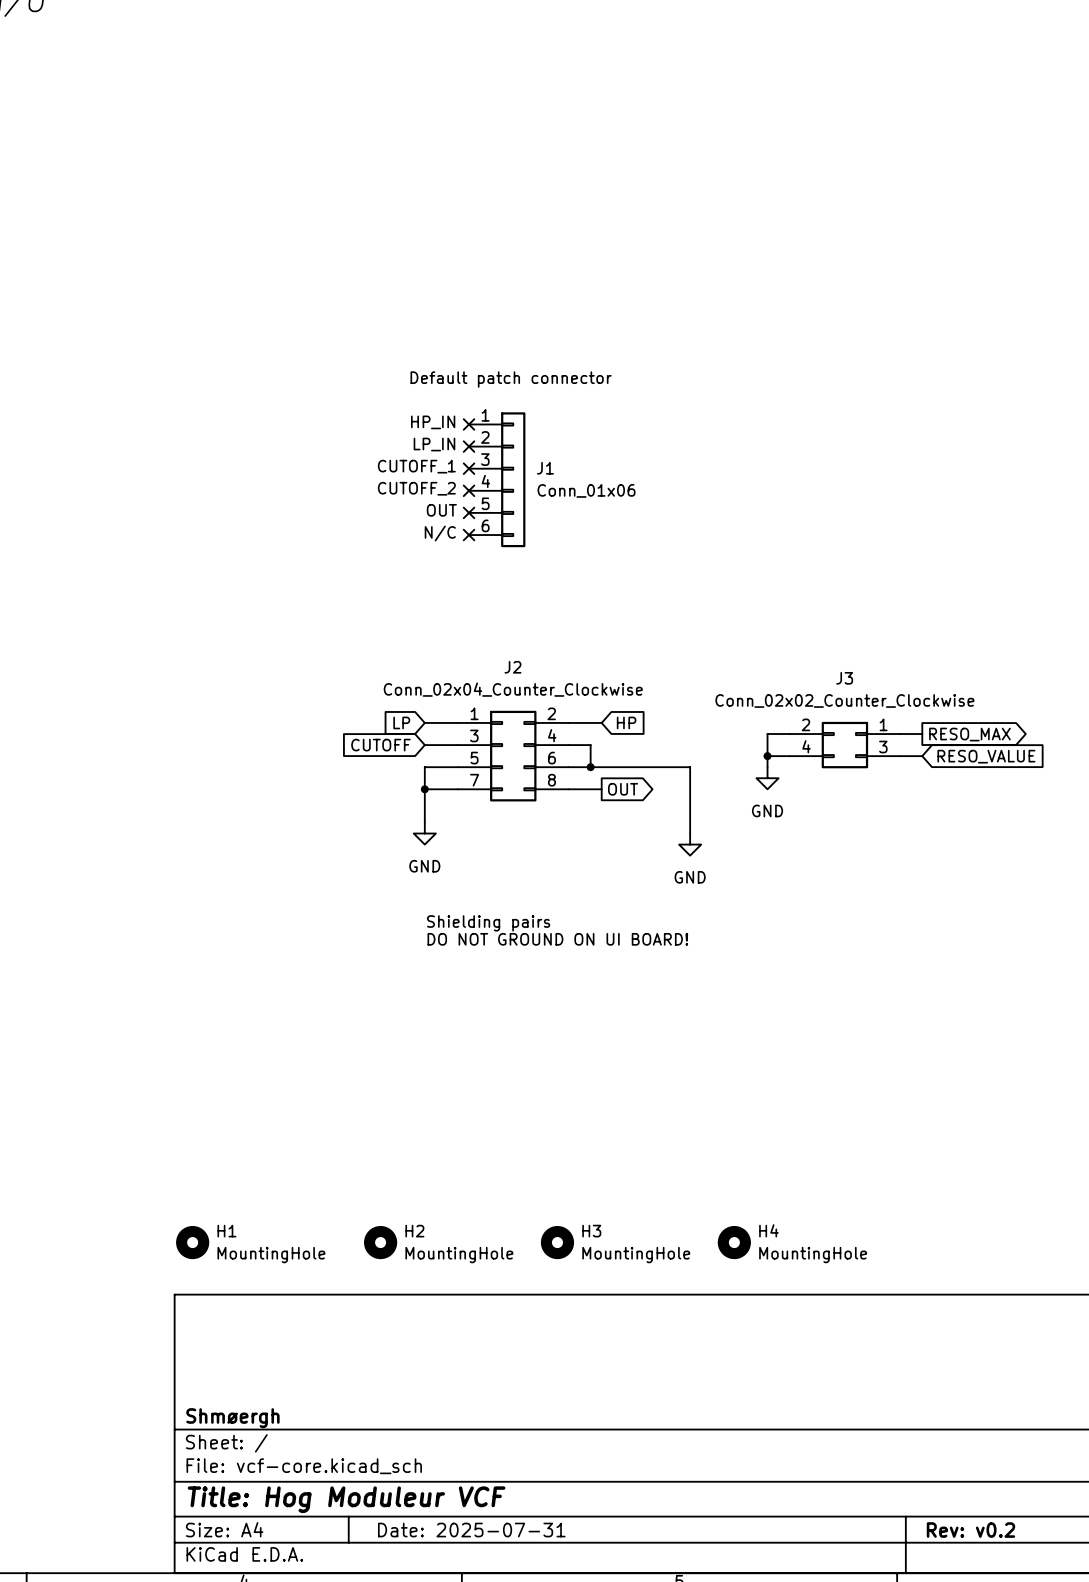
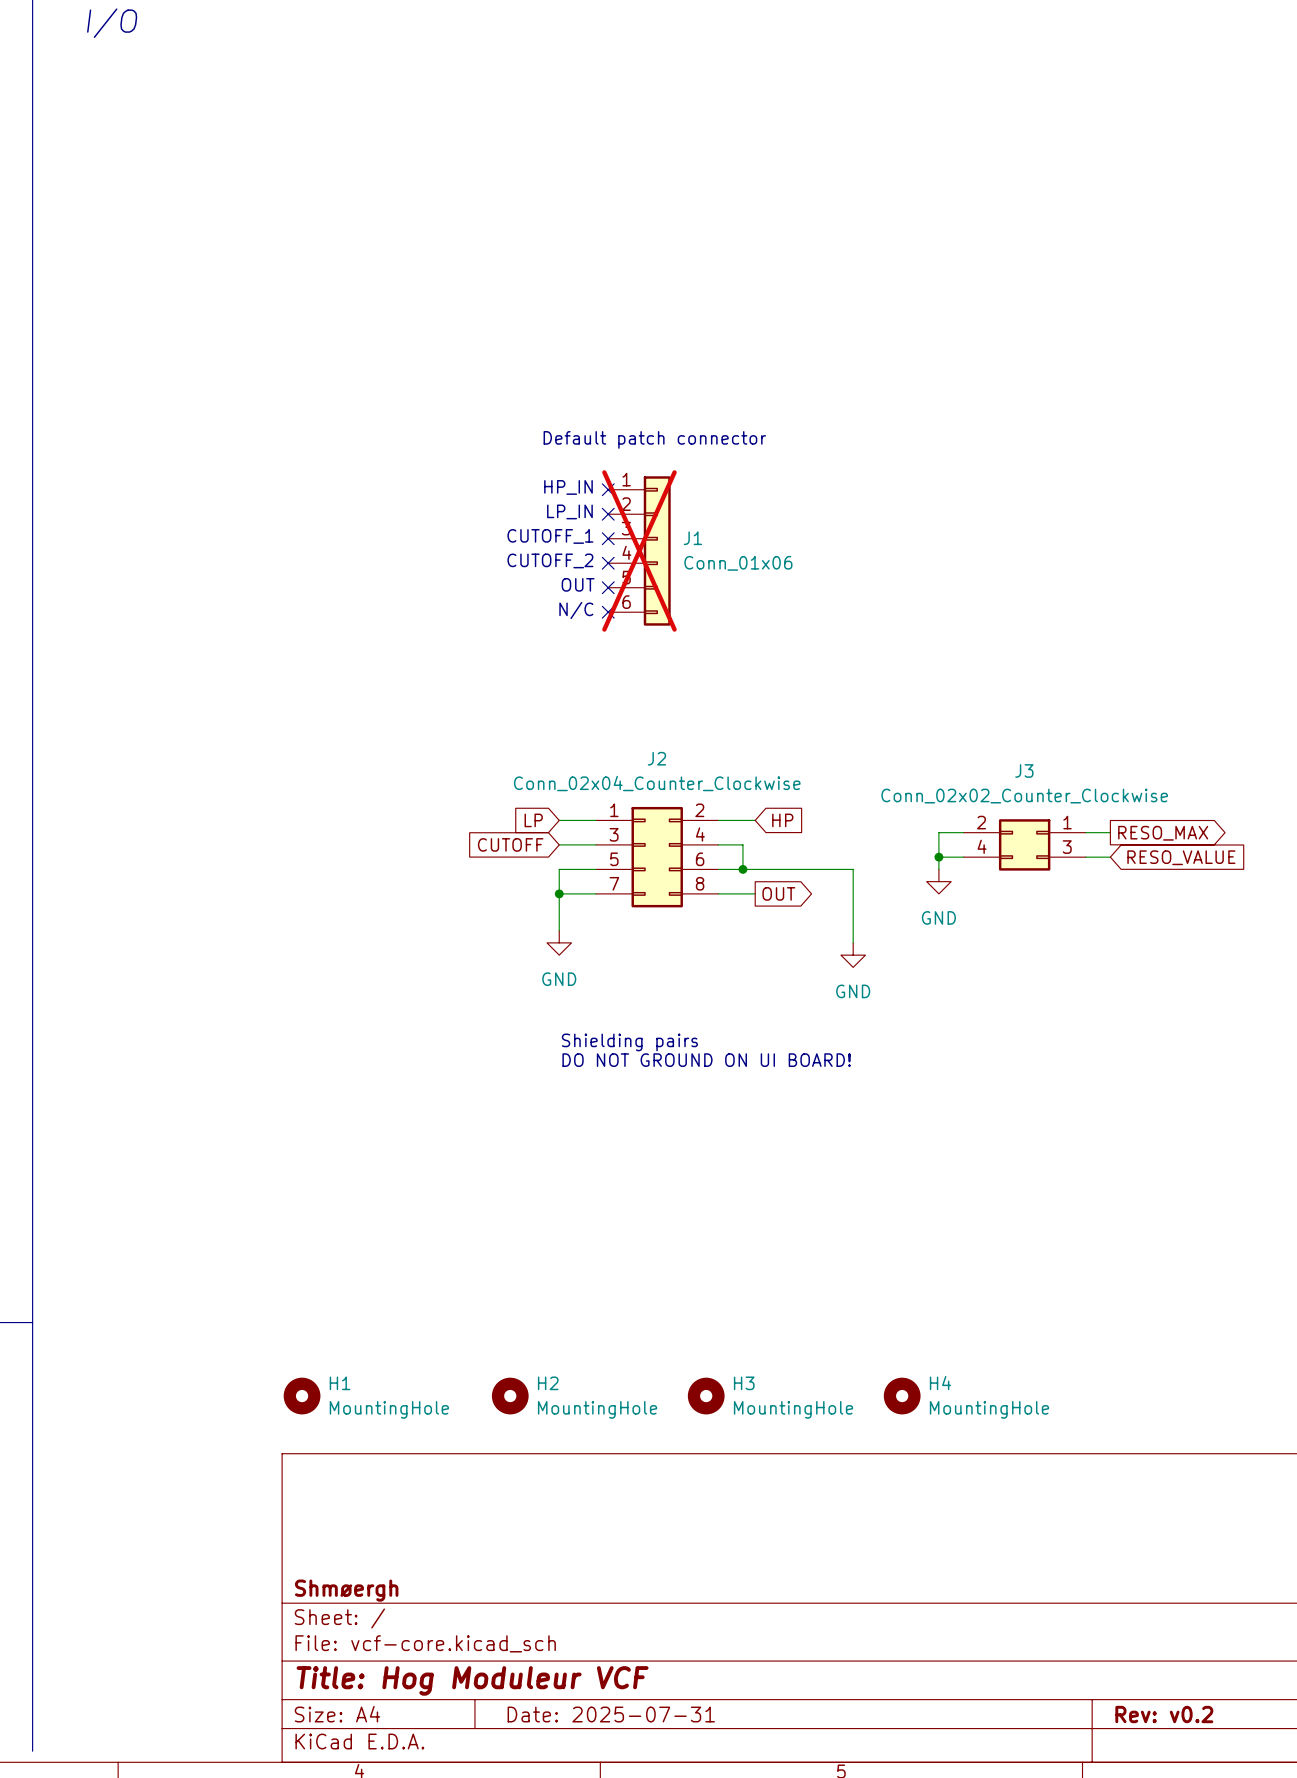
J1 do-not-place cross: none -> (639, 550)

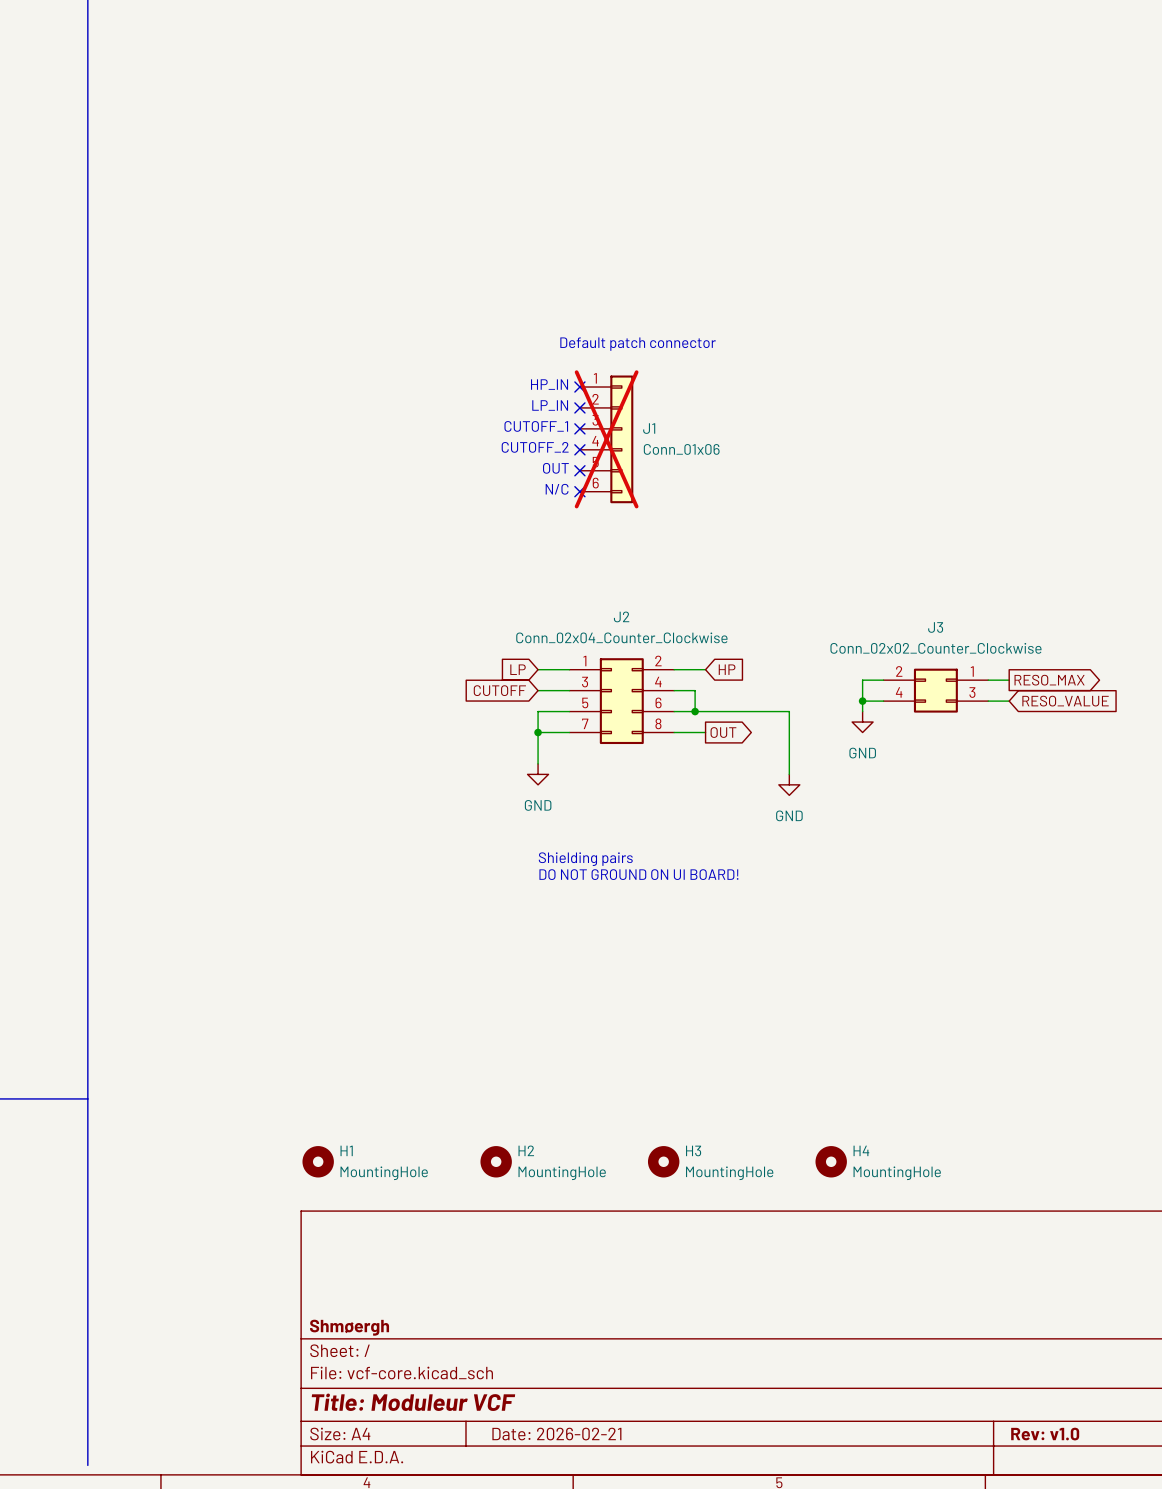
title block: Title: Hog Moduleur VCF (472, 1680) -> Title: Moduleur VCF (413, 1402)
title block: Date: 2025-07-31 (611, 1714) -> Date: 2026-02-21 (556, 1434)
title block: Rev: v0.2 (1164, 1714) -> Rev: v1.0 (1045, 1434)

